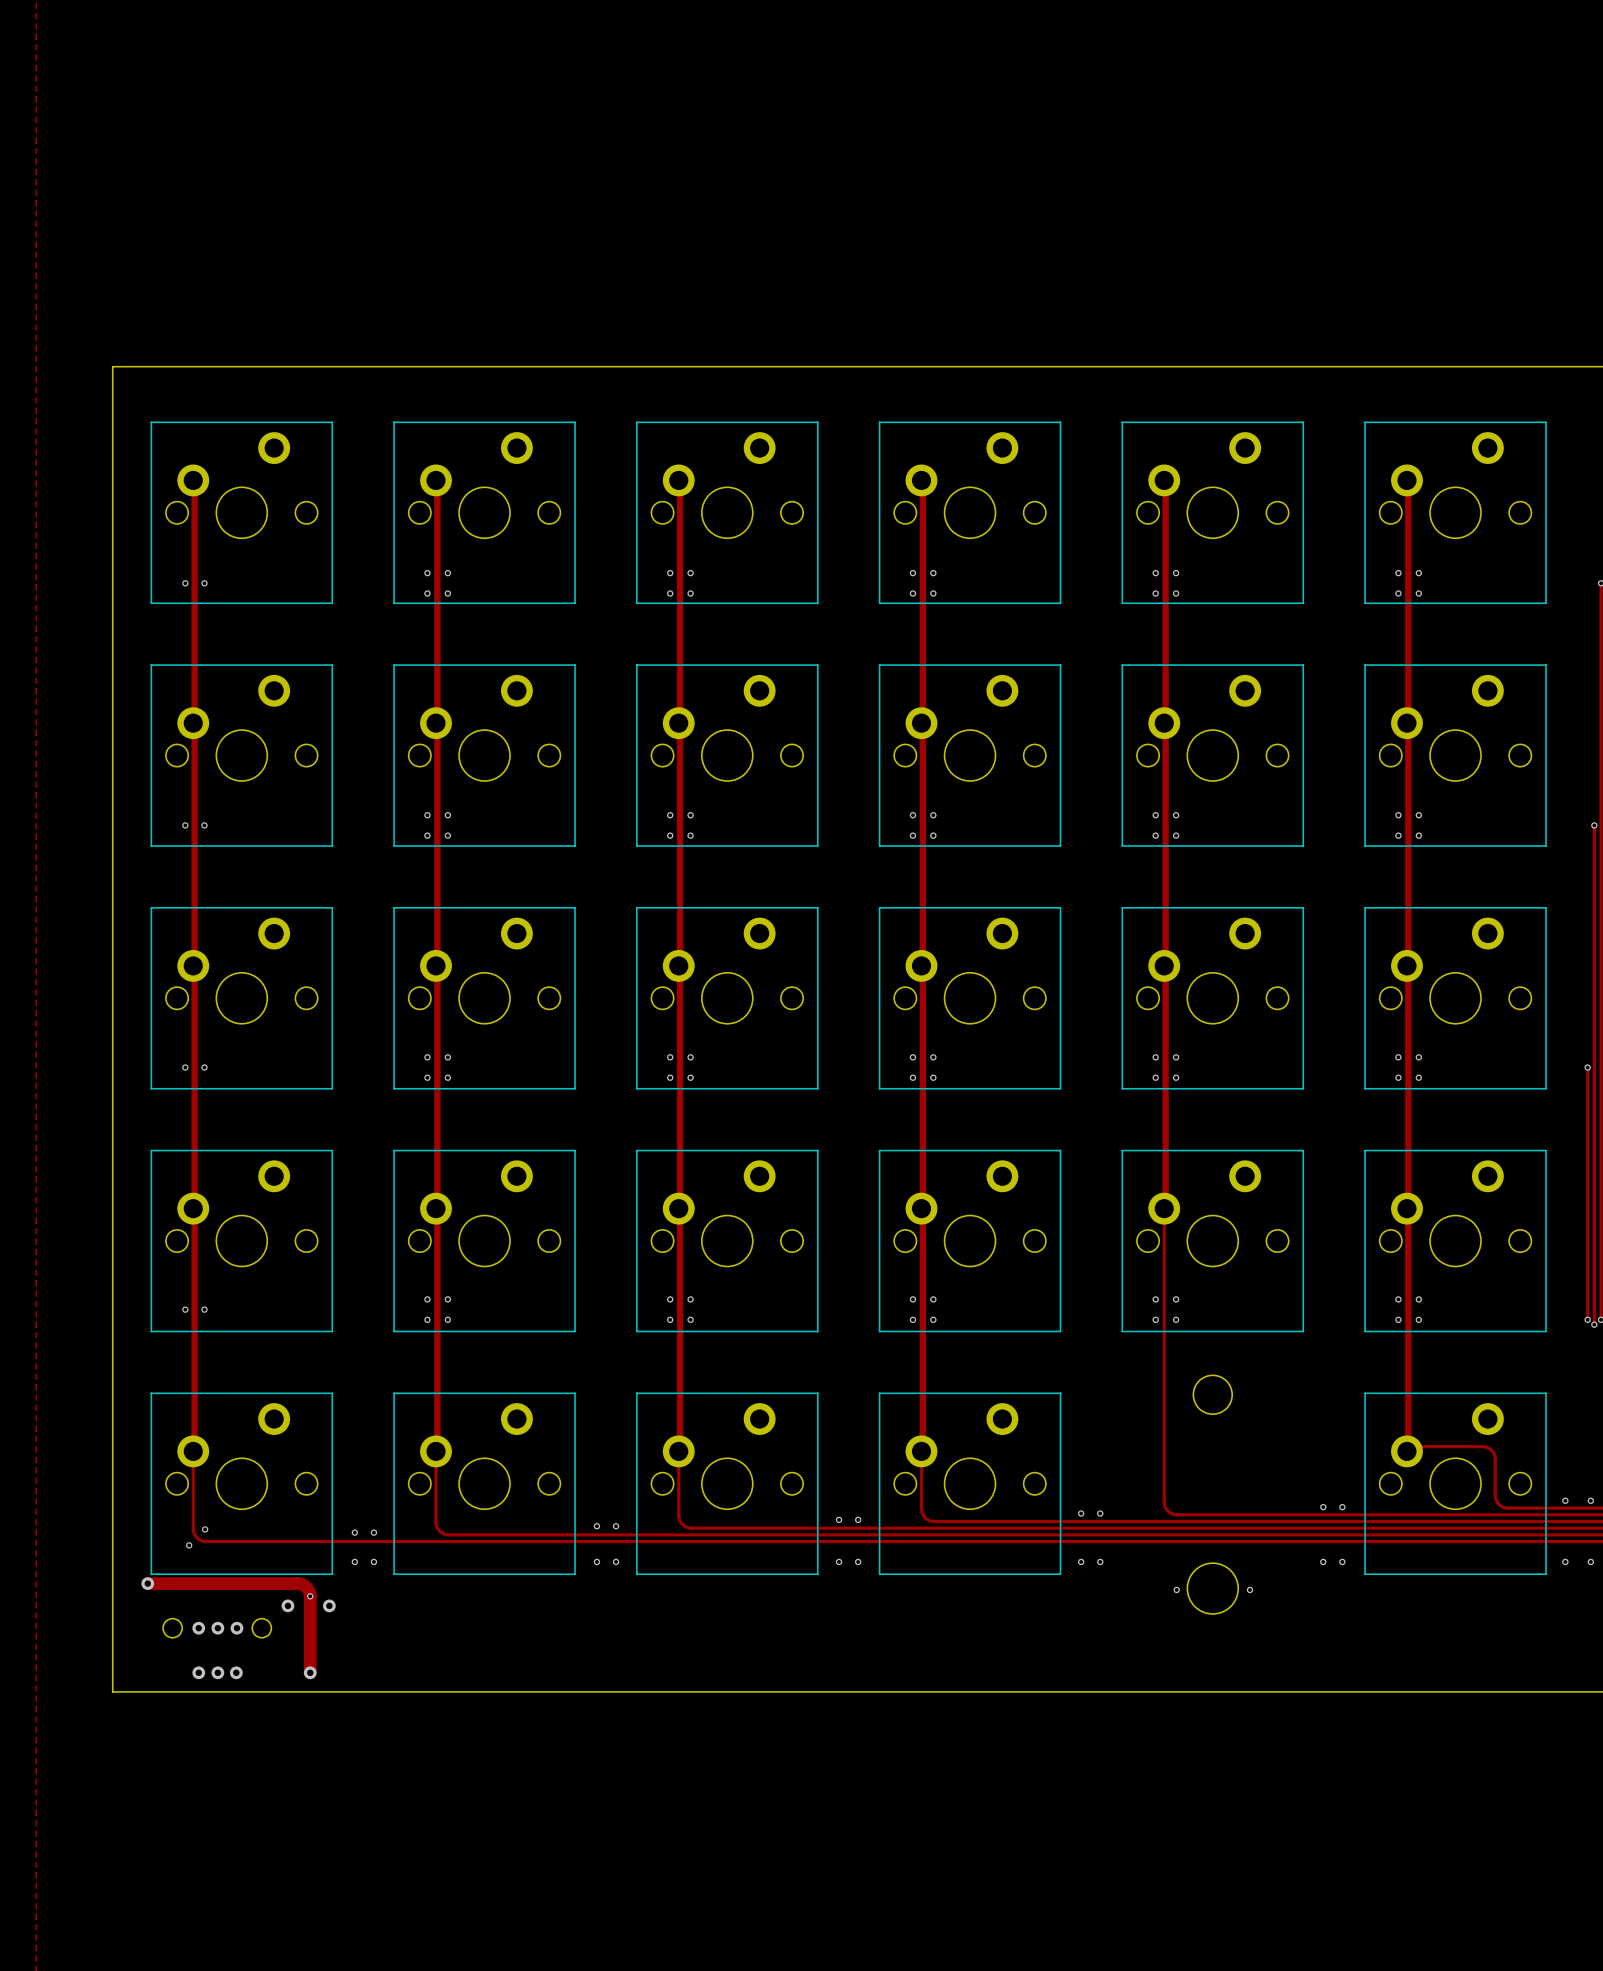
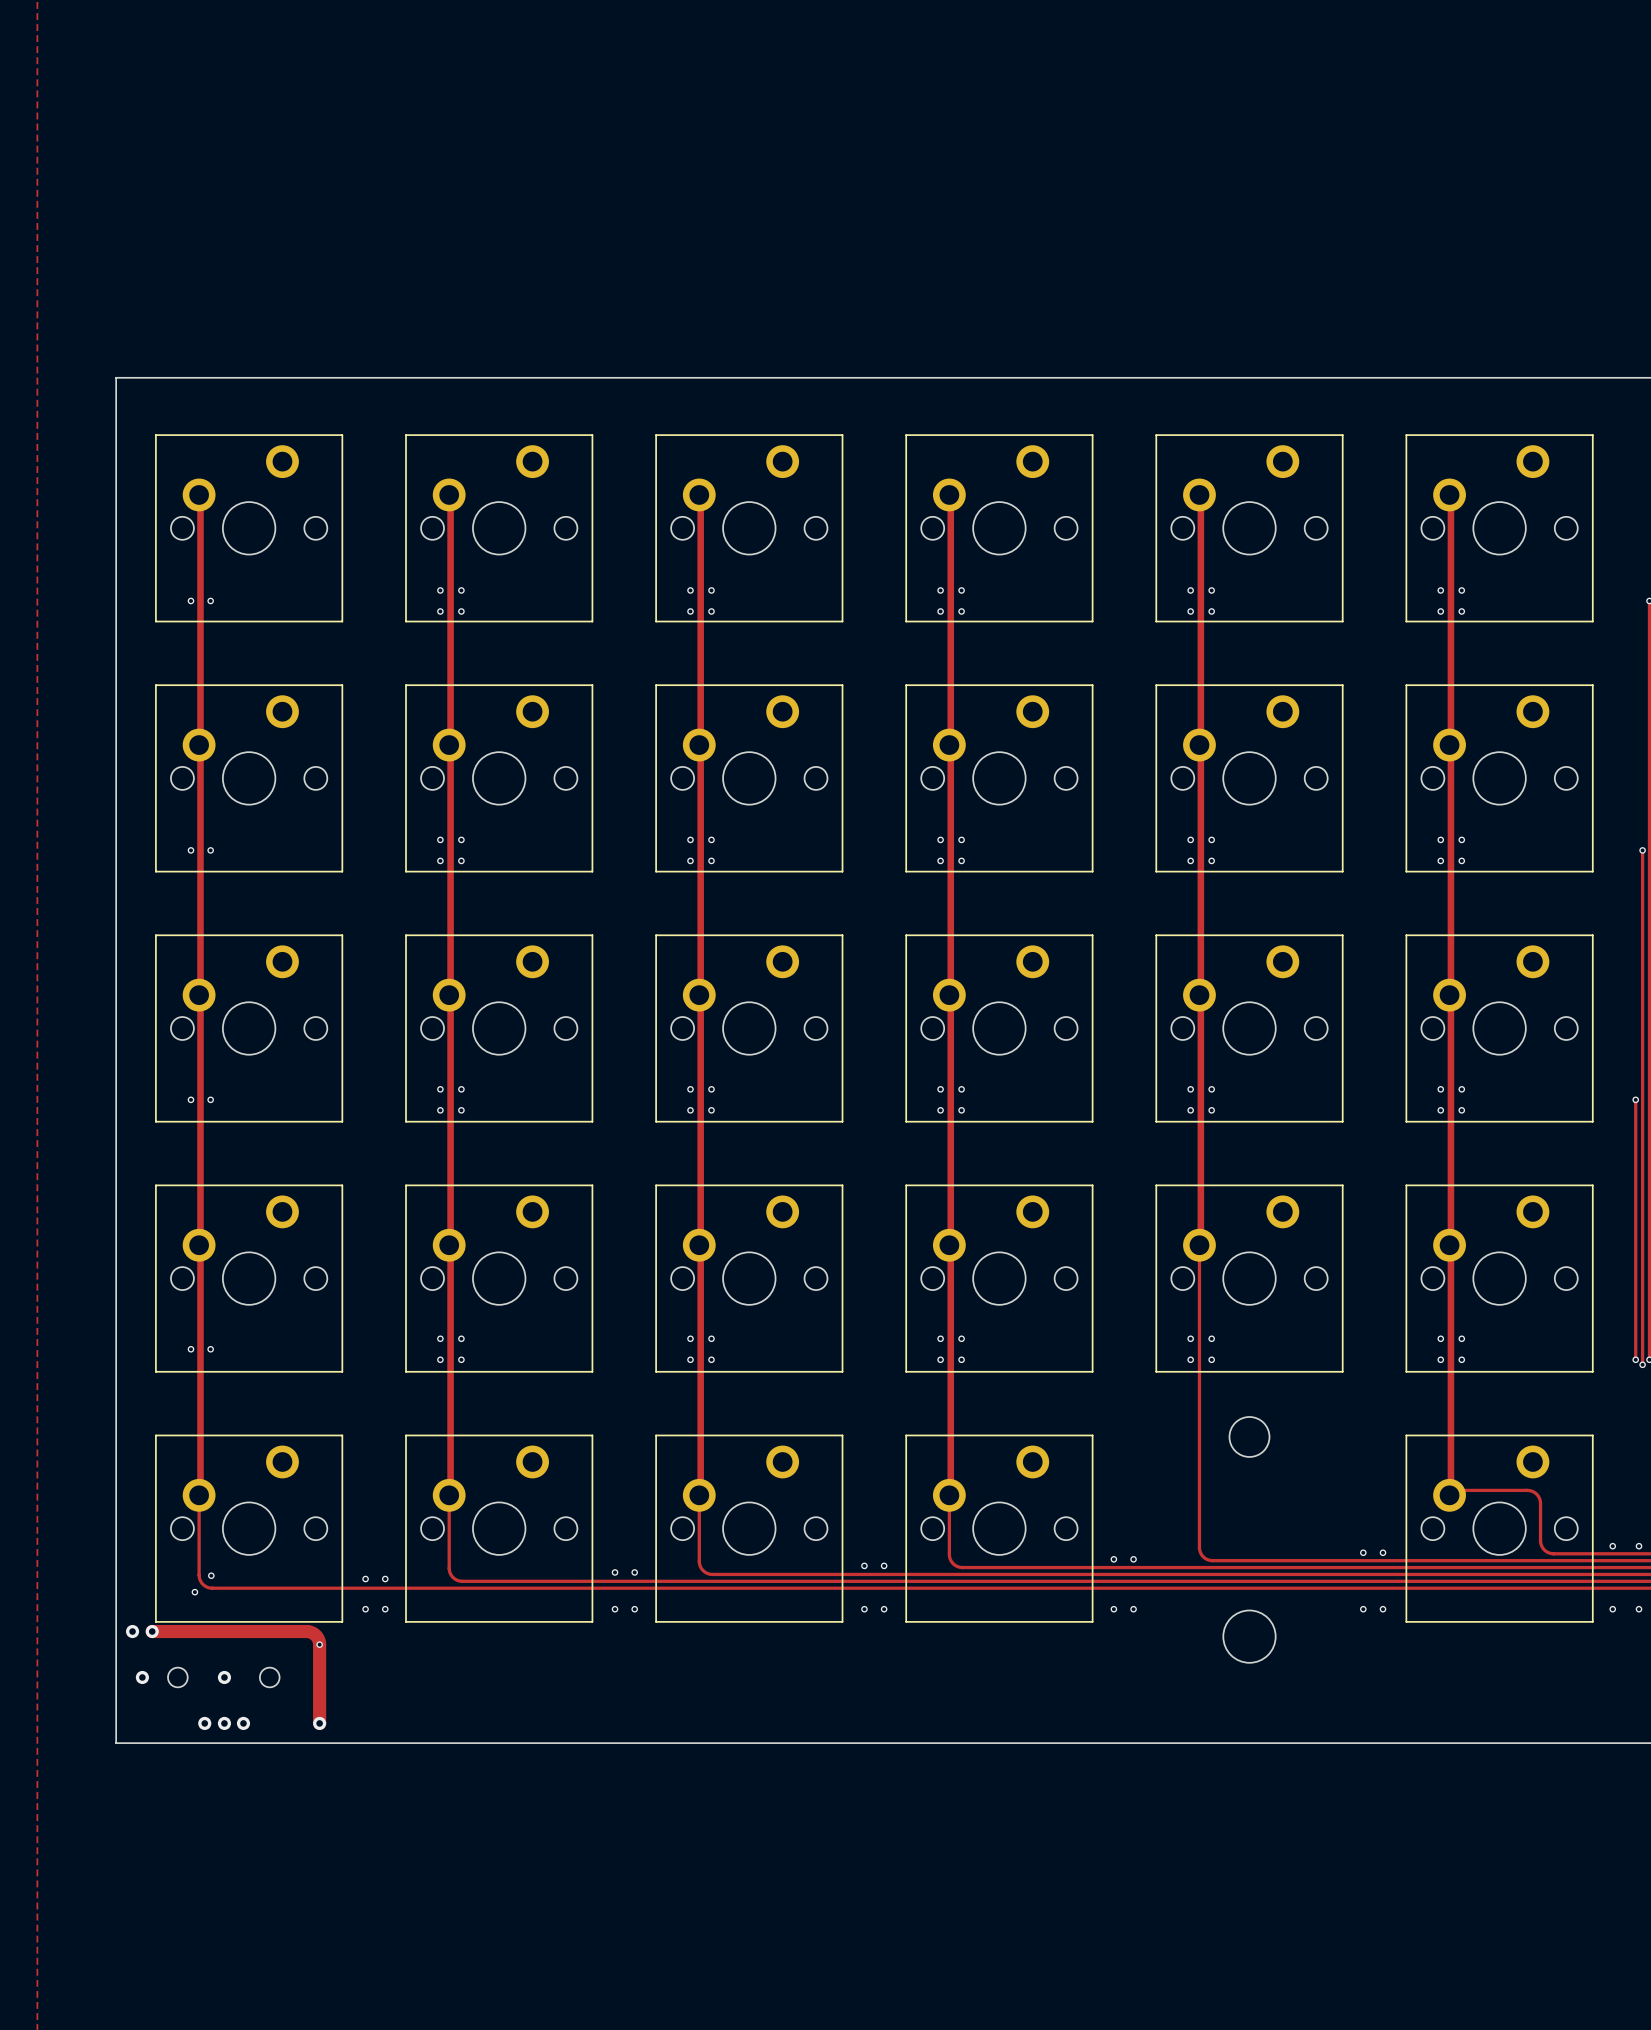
via: none -> (132, 1631)
via: (1176, 1589) -> none
via: (1249, 1589) -> none
via: (287, 1605) -> none
via: (329, 1605) -> none
via: none -> (142, 1677)
via: (198, 1628) -> none
via: (236, 1628) -> none

